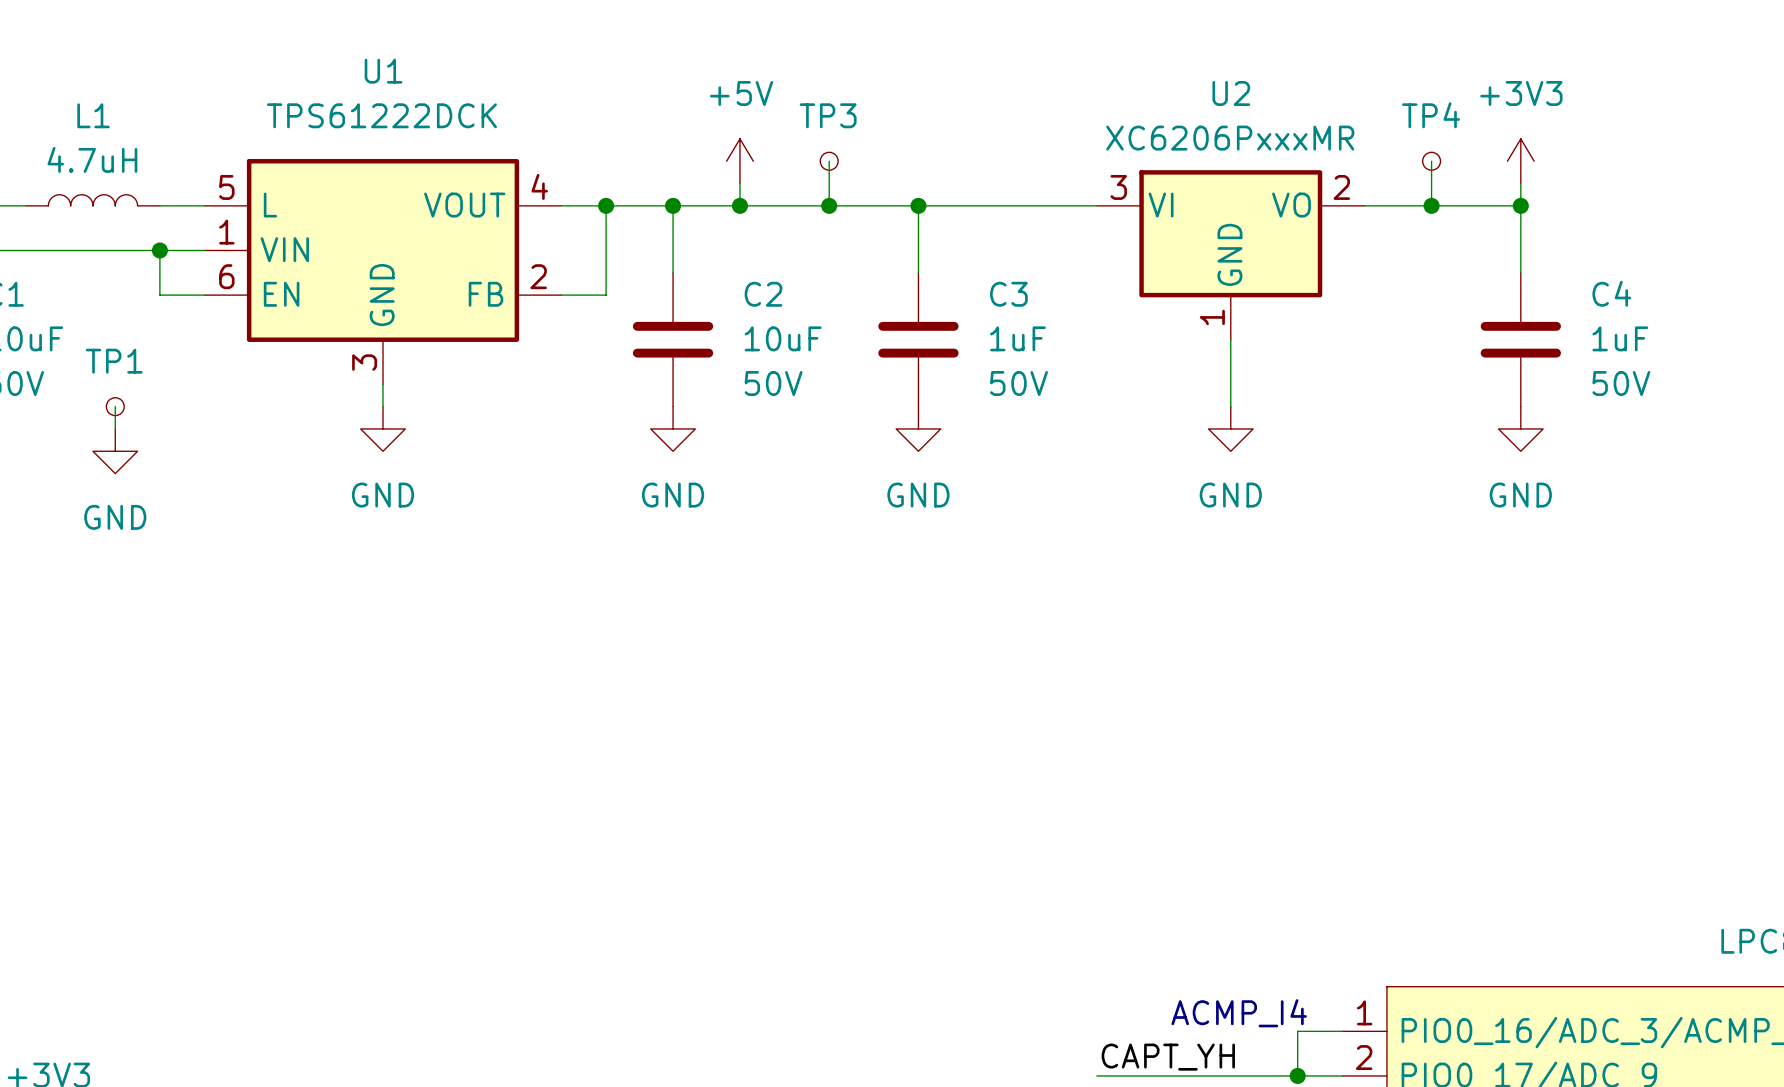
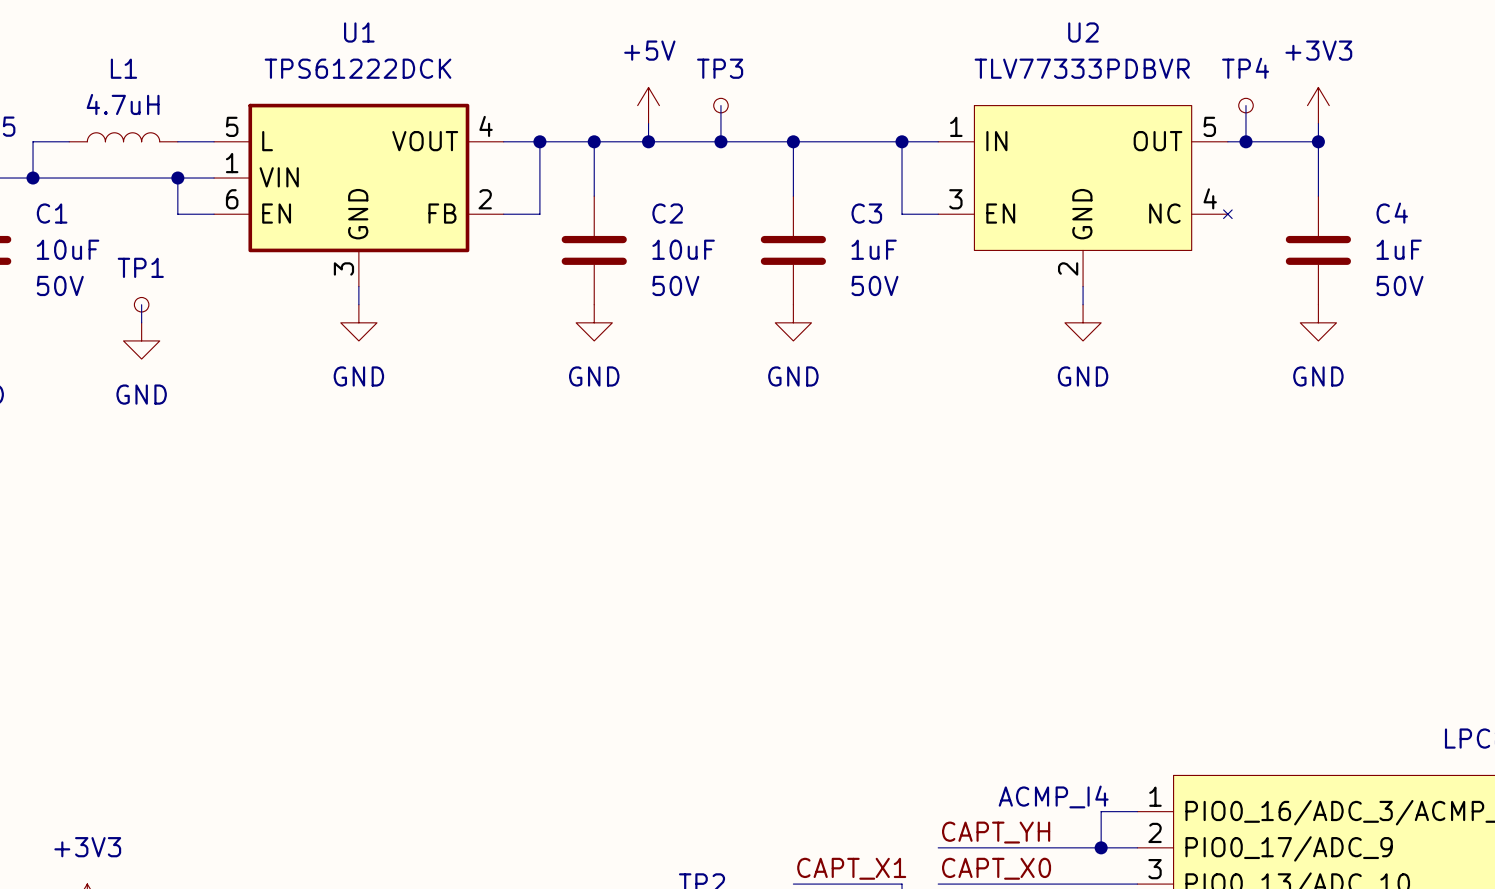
U2 name position: U2 (1231, 93) -> U2 (1083, 32)
U2 value: XC6206PxxxMR (1230, 138) -> TLV77333PDBVR (1082, 68)
wire: (1431, 161) (1431, 205) -> (1245, 105) (1245, 141)
TP4 position: (1431, 161) -> (1245, 105)
power symbol position: +3V3 (1520, 161) -> +3V3 (1318, 105)
U2 symbol: [1096, 170, 1365, 340] -> [938, 105, 1233, 287]
wire: (1520, 183) (1520, 272) -> (1318, 123) (1318, 196)
wire: none -> (902, 141) (902, 214) (938, 214)
junction: none -> (902, 141)
junction: (1431, 205) -> none
junction: none -> (1245, 141)
wire: none -> (1282, 141) (1318, 141)
junction: (1520, 205) -> none
junction: none -> (1318, 141)
wire: (1230, 339) (1230, 406) -> none
C4 position: (1520, 339) -> (1318, 250)
wire: none -> (1083, 286) (1083, 304)
power symbol position: GND (1230, 428) -> GND (1083, 322)
power symbol position: GND (1520, 428) -> GND (1318, 322)

